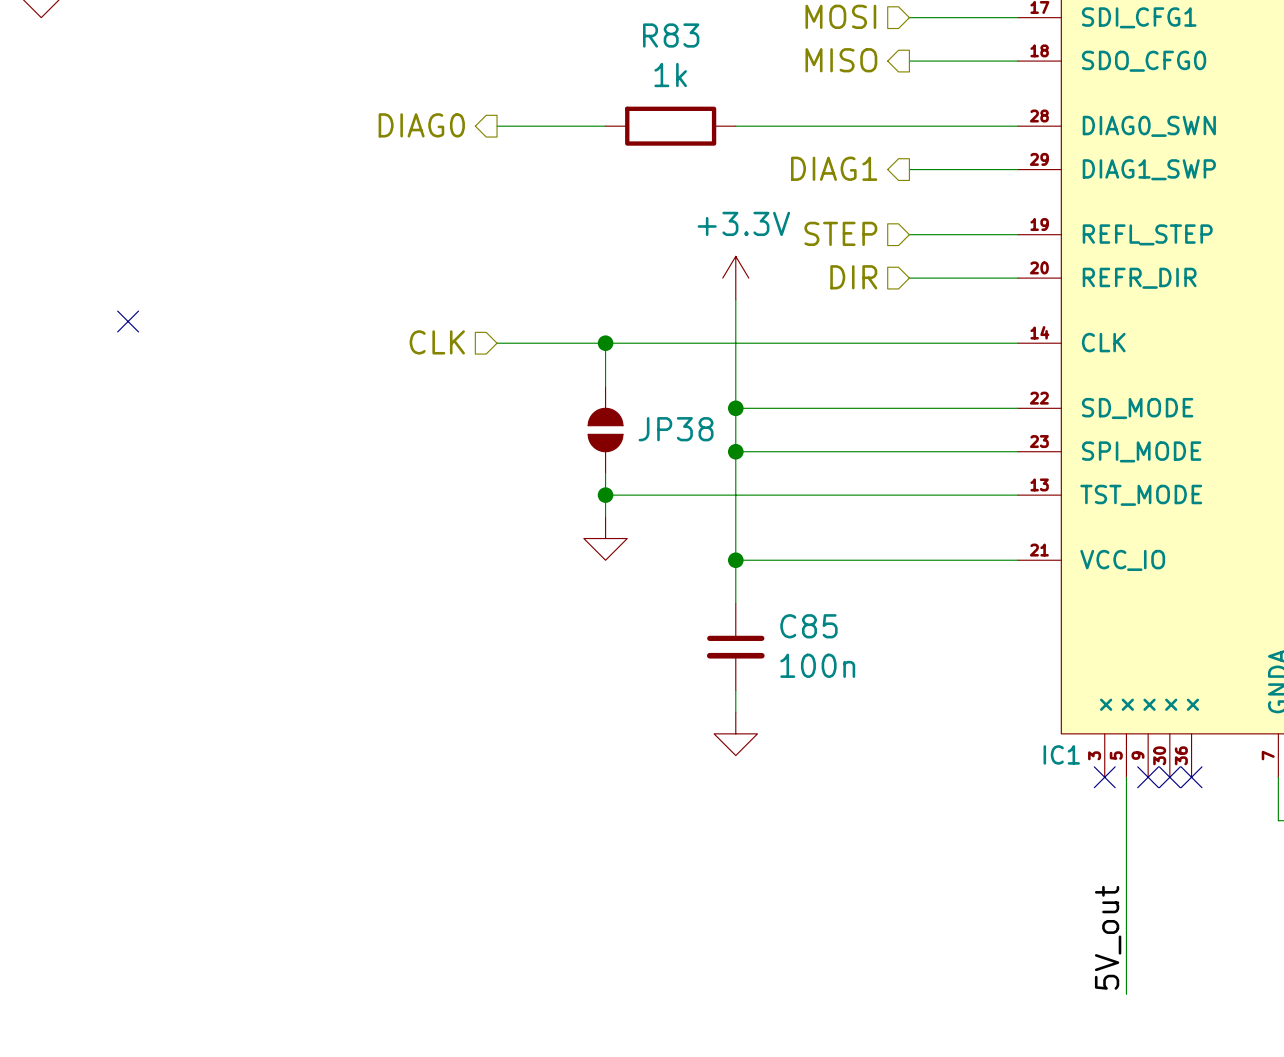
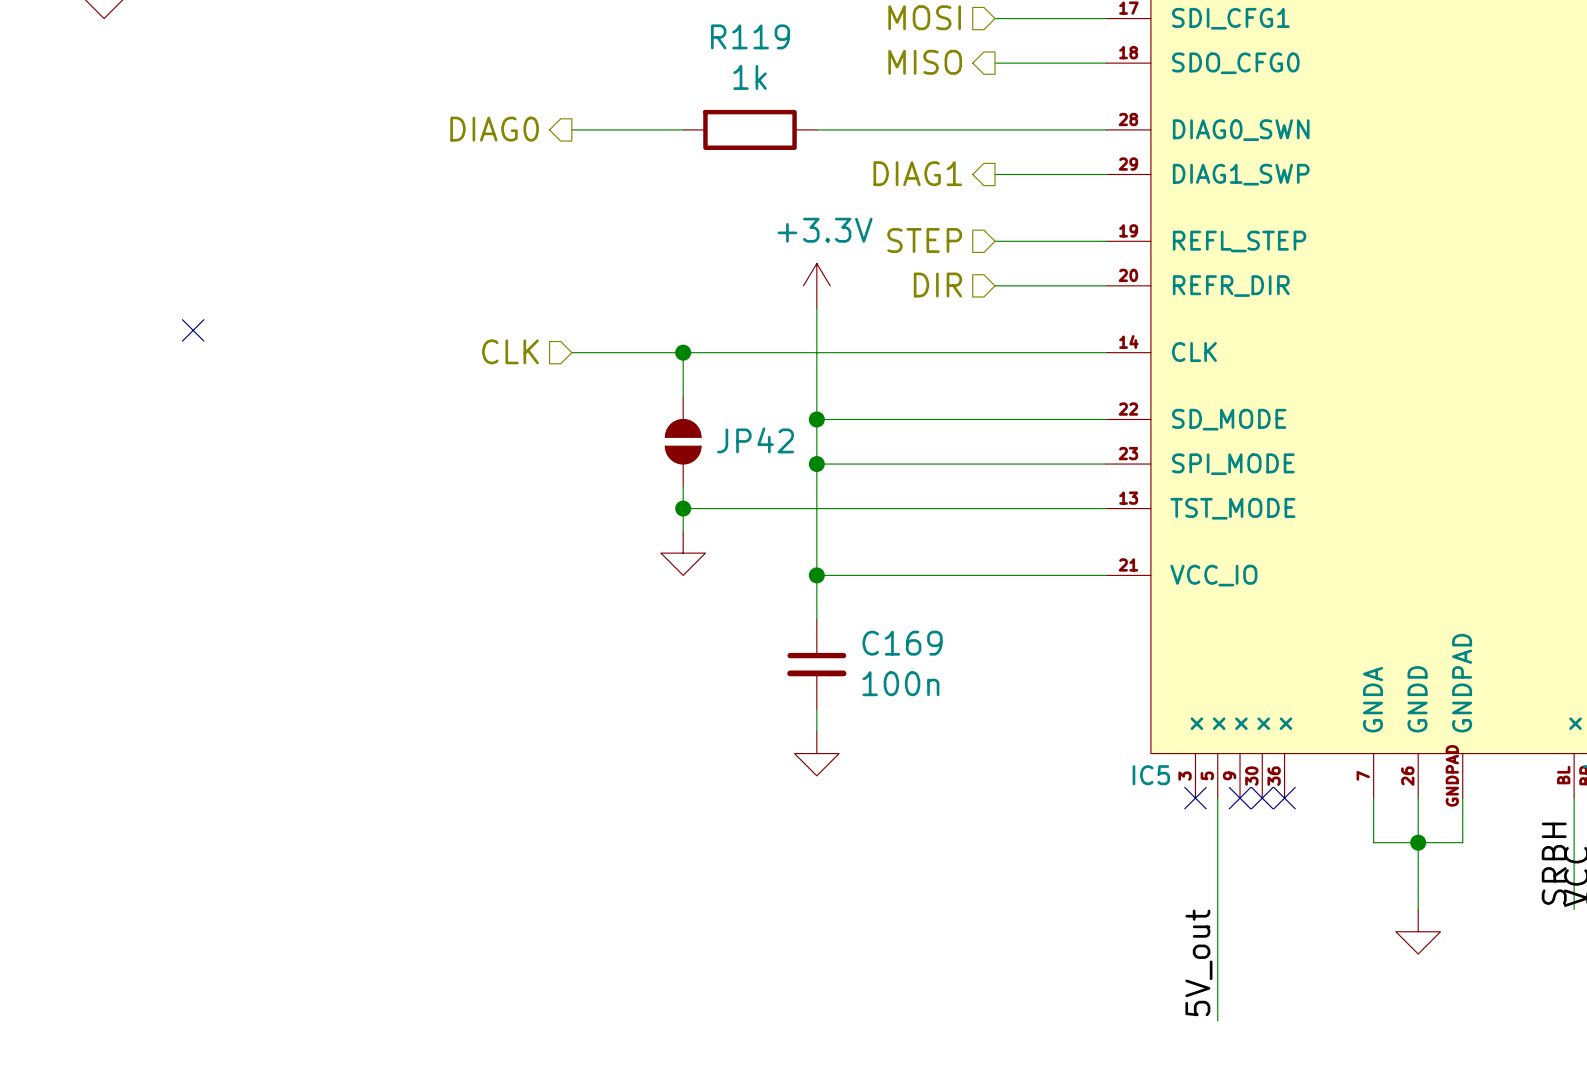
R83 name: R83 (671, 35) -> R119 (750, 36)
JP38 name: JP38 (676, 429) -> JP42 (755, 440)
C85 name: C85 (808, 626) -> C169 (902, 643)
IC1 name: IC1 (1061, 754) -> IC5 (1151, 775)

